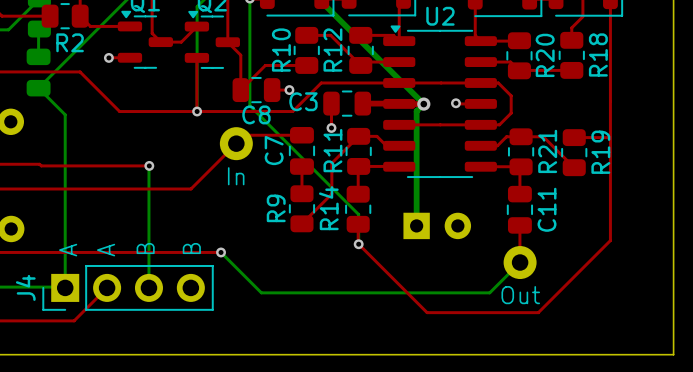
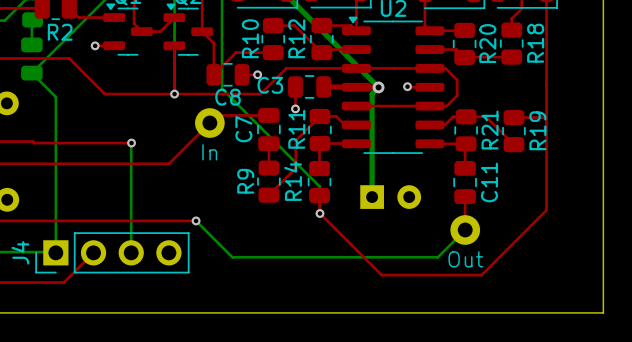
text: B (145, 248) -> none
text: B (191, 248) -> none
text: A (68, 250) -> none
text: A (106, 250) -> none

